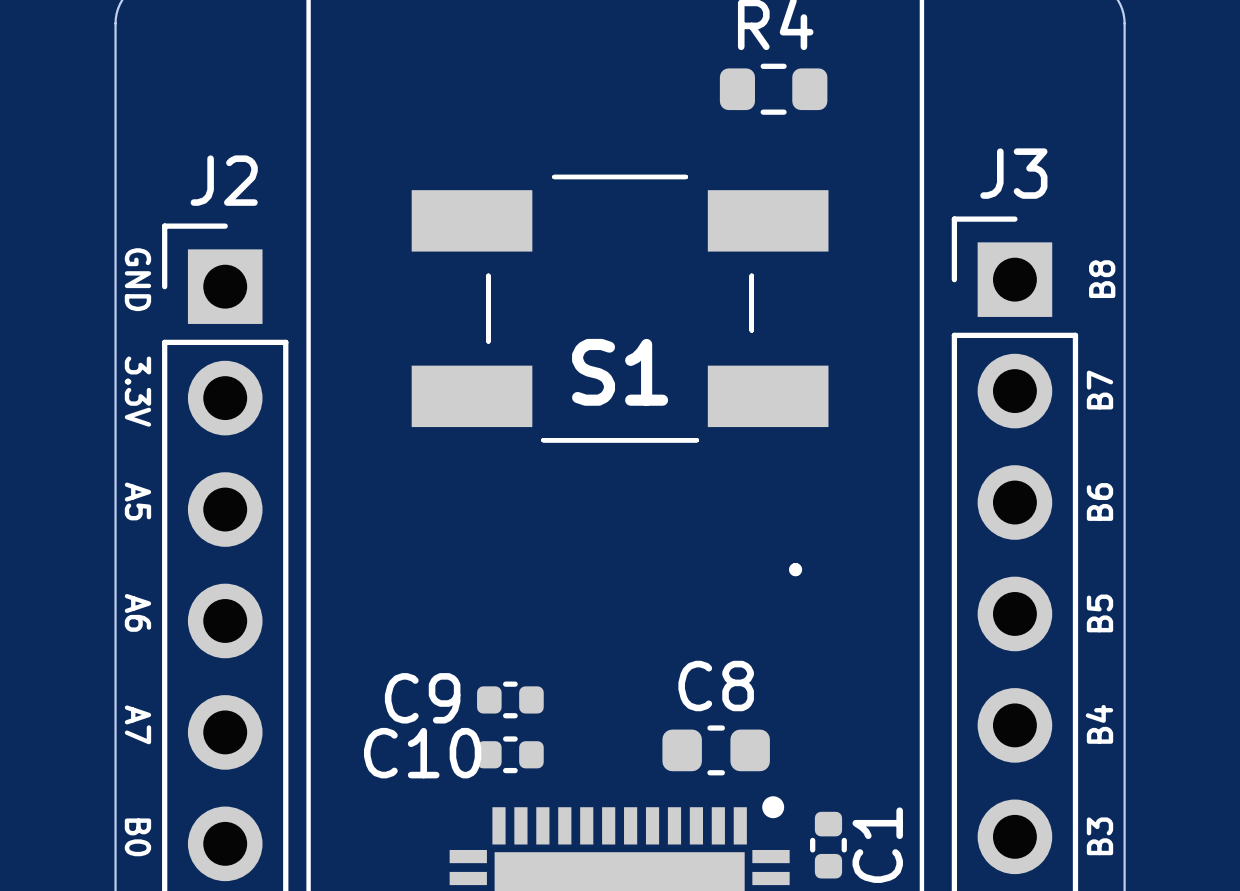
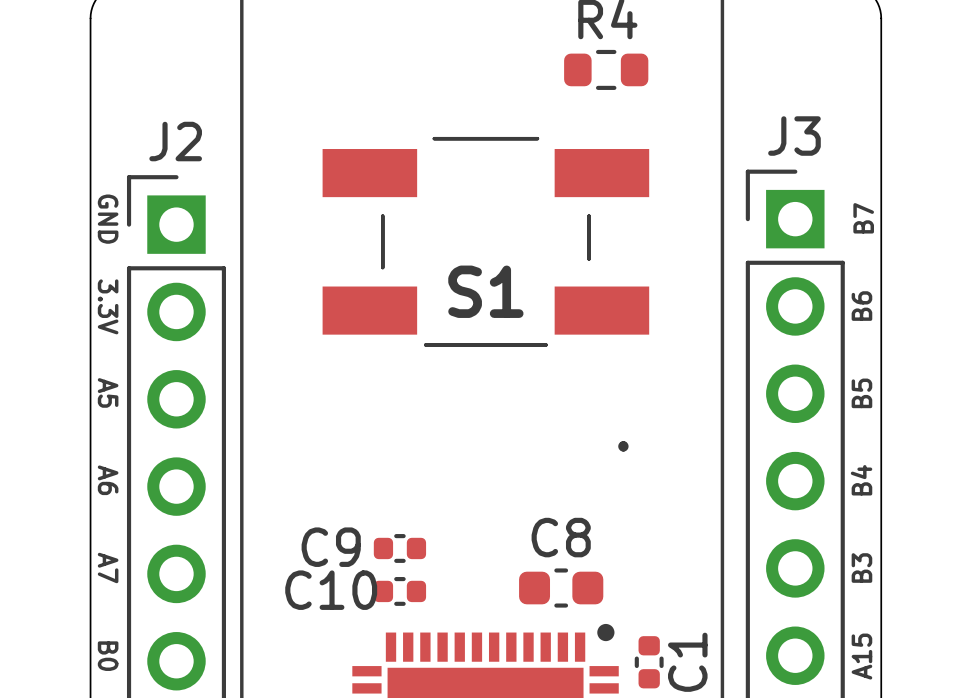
text: B8 (1102, 279) -> B7 (863, 218)
text: B7 (1099, 390) -> B6 (861, 306)
text: B6 (1099, 501) -> B5 (861, 393)
text: B5 (1099, 613) -> B4 (861, 480)
text: B4 (1099, 724) -> B3 (861, 568)
text: B3 (1099, 836) -> A15 (861, 656)

